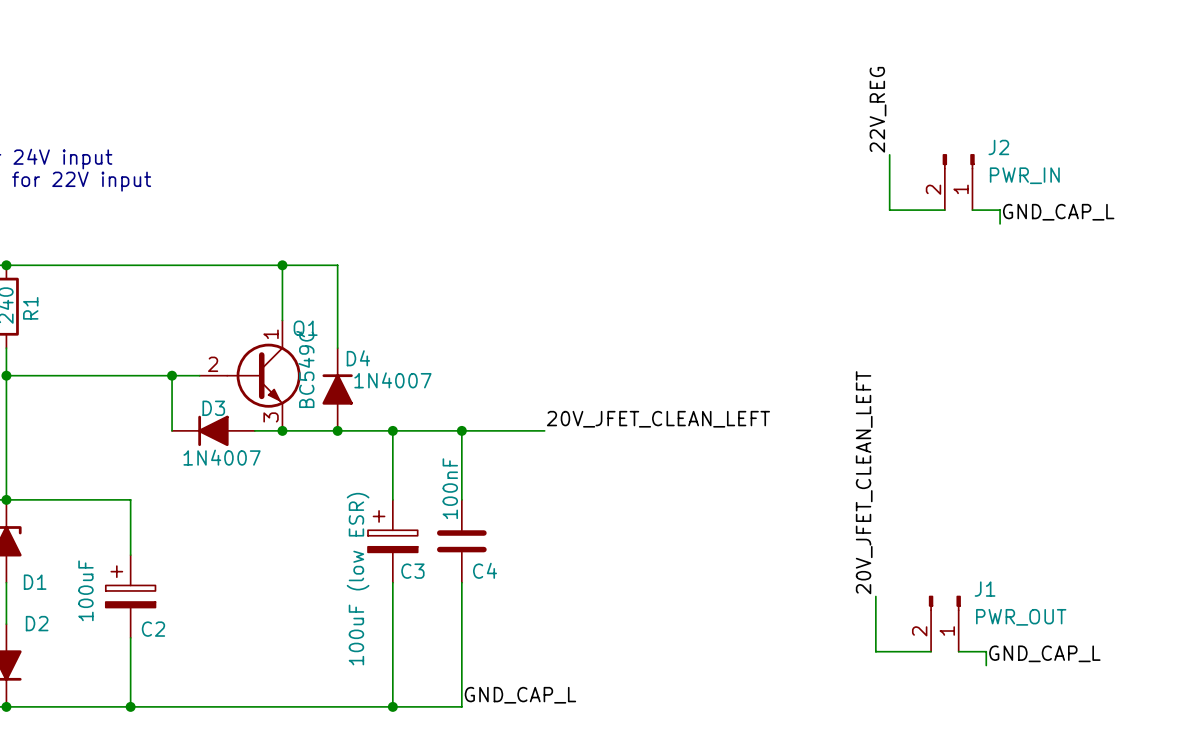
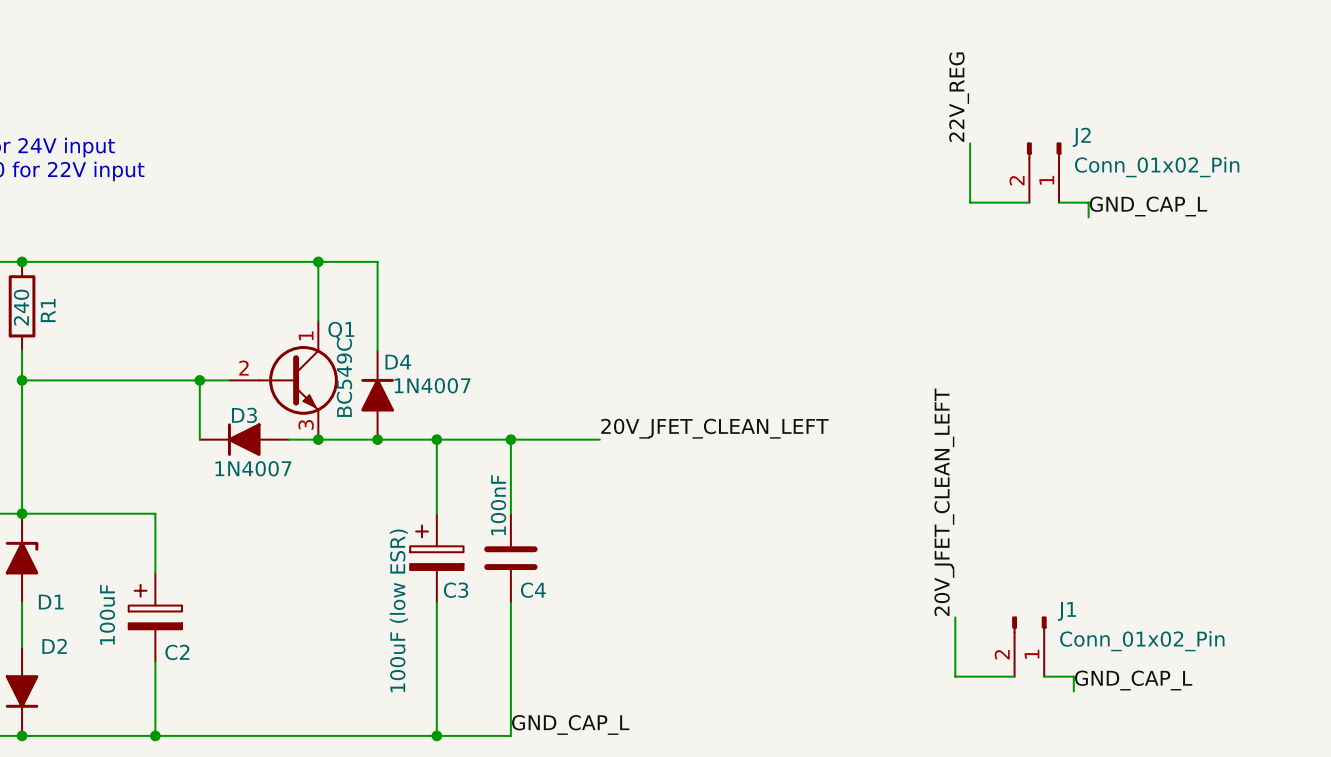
J2 value: PWR_IN (1024, 175) -> Conn_01x02_Pin (1157, 167)
J1 value: PWR_OUT (1021, 617) -> Conn_01x02_Pin (1142, 641)

